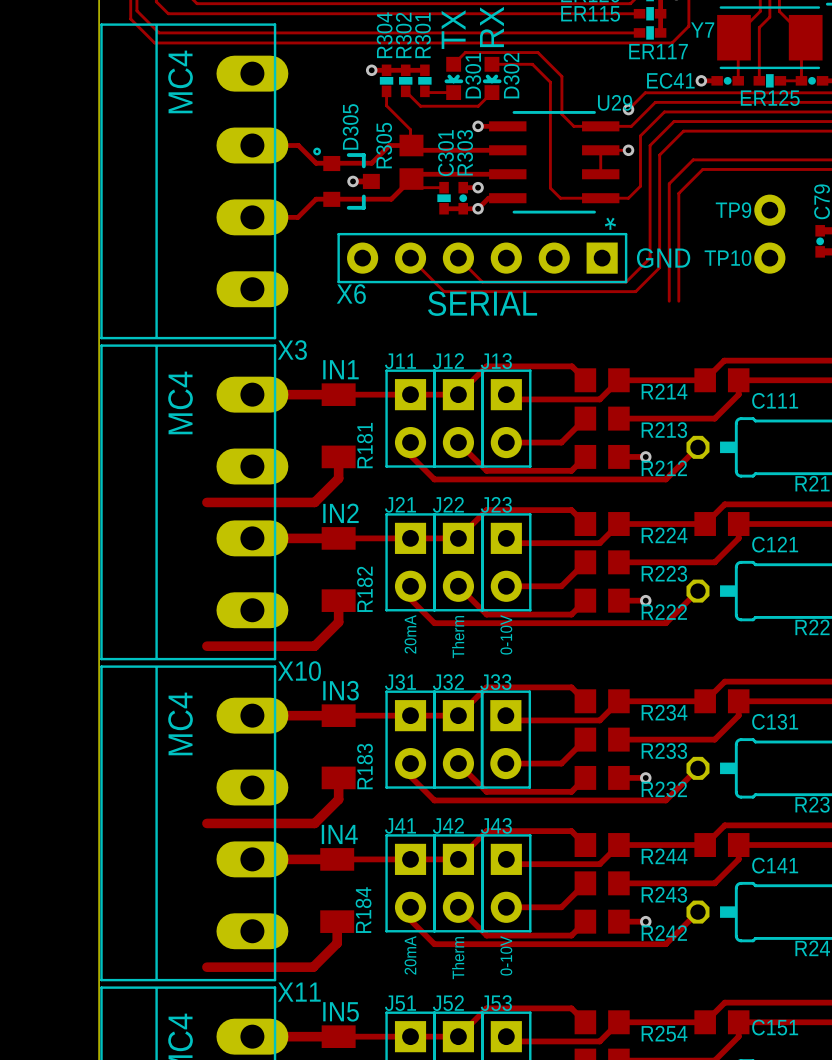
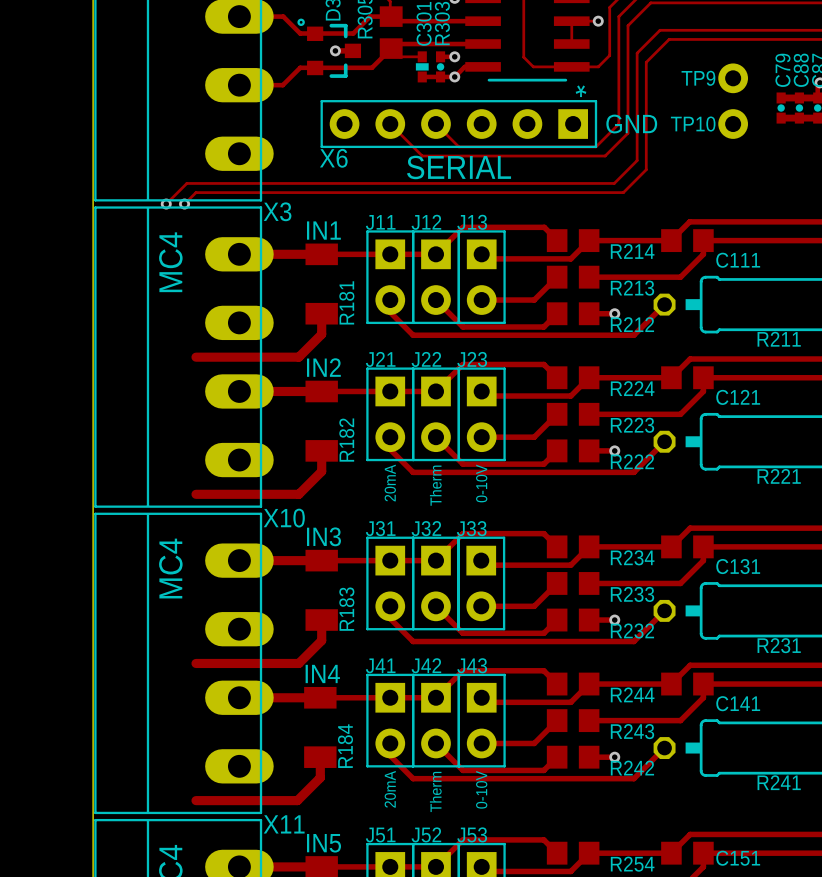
track: (669, 296) (669, 301) -> (637, 160) (614, 183) (186, 183) (166, 204)
track: none -> (646, 165) (646, 169) (623, 192) (195, 192) (184, 204)
via: none -> (166, 204)
via: none -> (184, 204)

